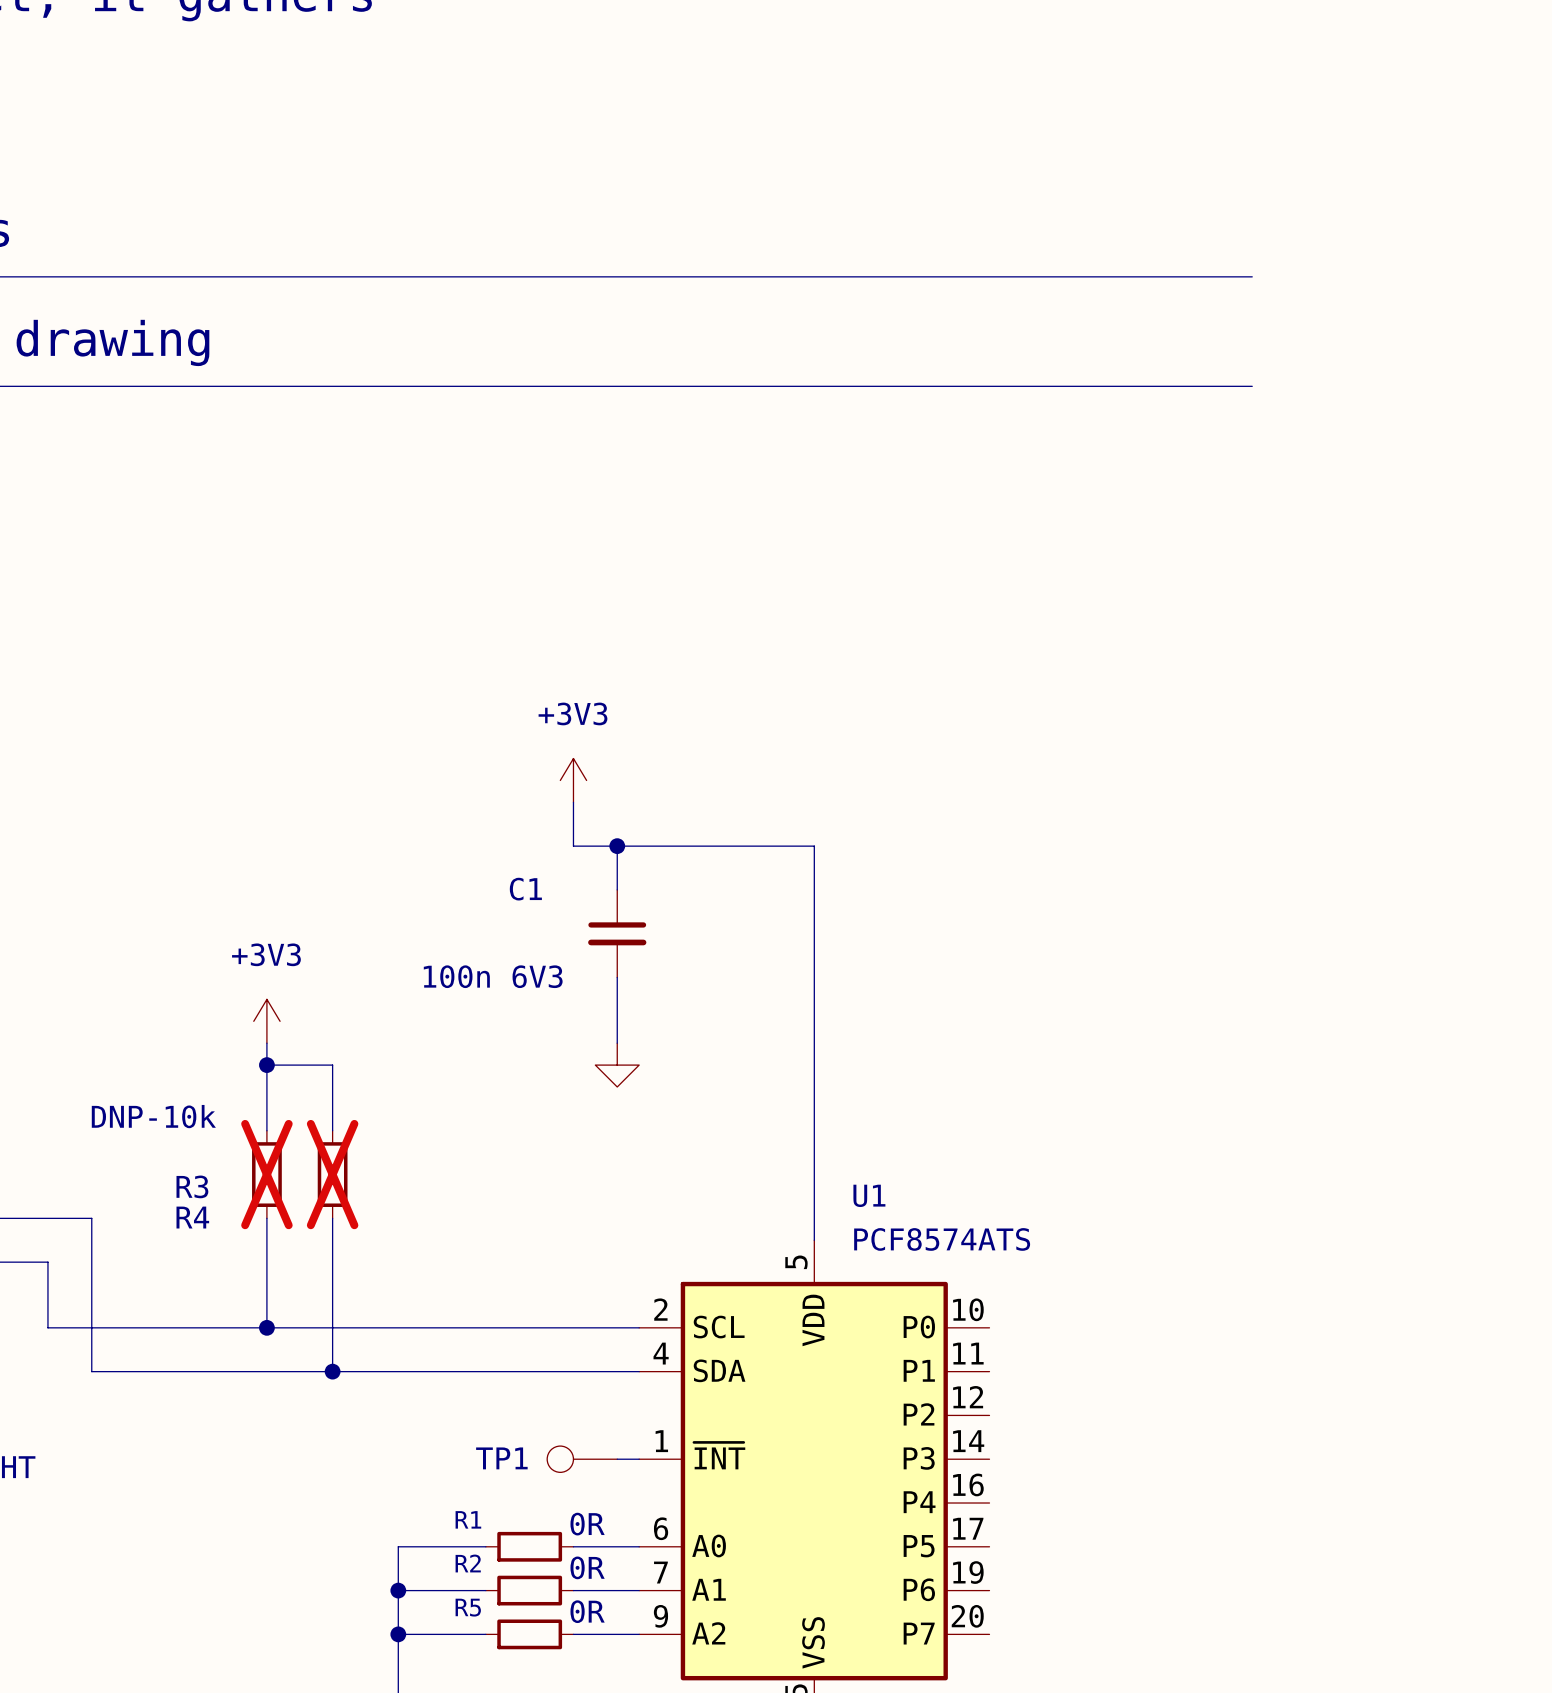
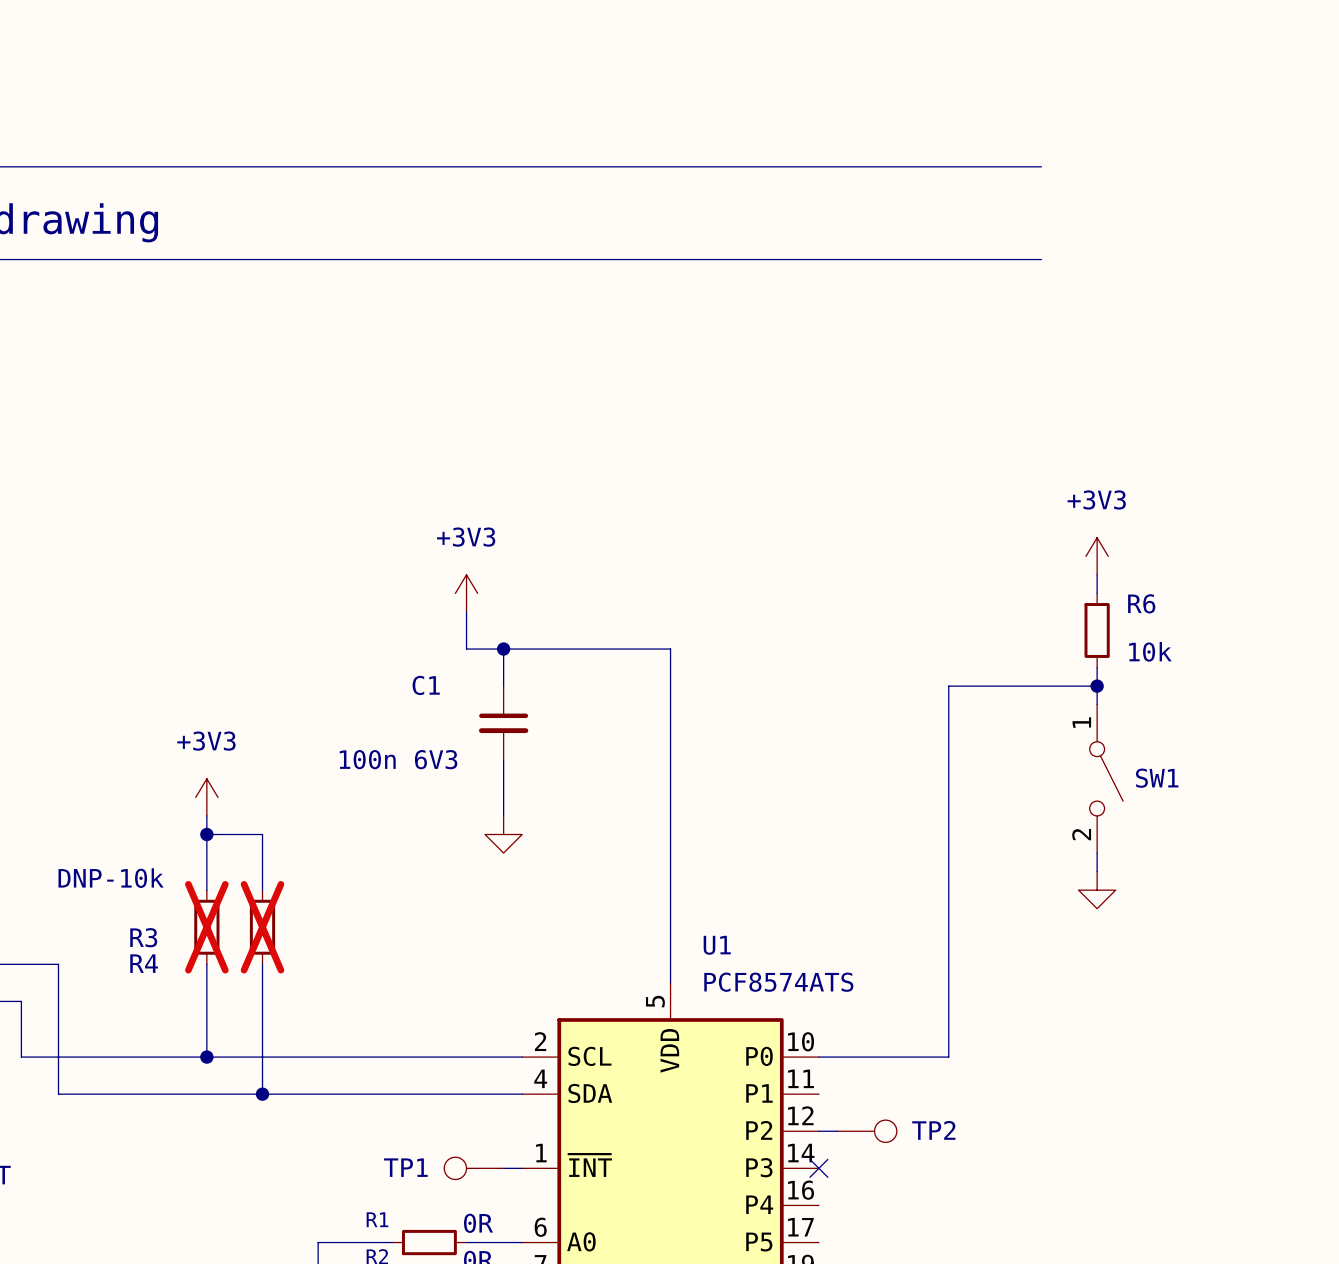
power symbol: none -> +3V3 (1097, 556)
wire: none -> (1097, 574) (1097, 593)
R6: none -> 10k (1097, 630)
wire: none -> (1097, 667) (1097, 704)
wire: none -> (1097, 686) (948, 686) (948, 1057) (818, 1057)
junction: none -> (1097, 686)
SW1: none -> (1106, 778)
wire: none -> (1097, 853) (1097, 871)
power symbol: none -> (1097, 890)
wire: none -> (818, 1131) (837, 1131)
TP2: none -> (867, 1131)
no-connect mark: none -> (818, 1168)

